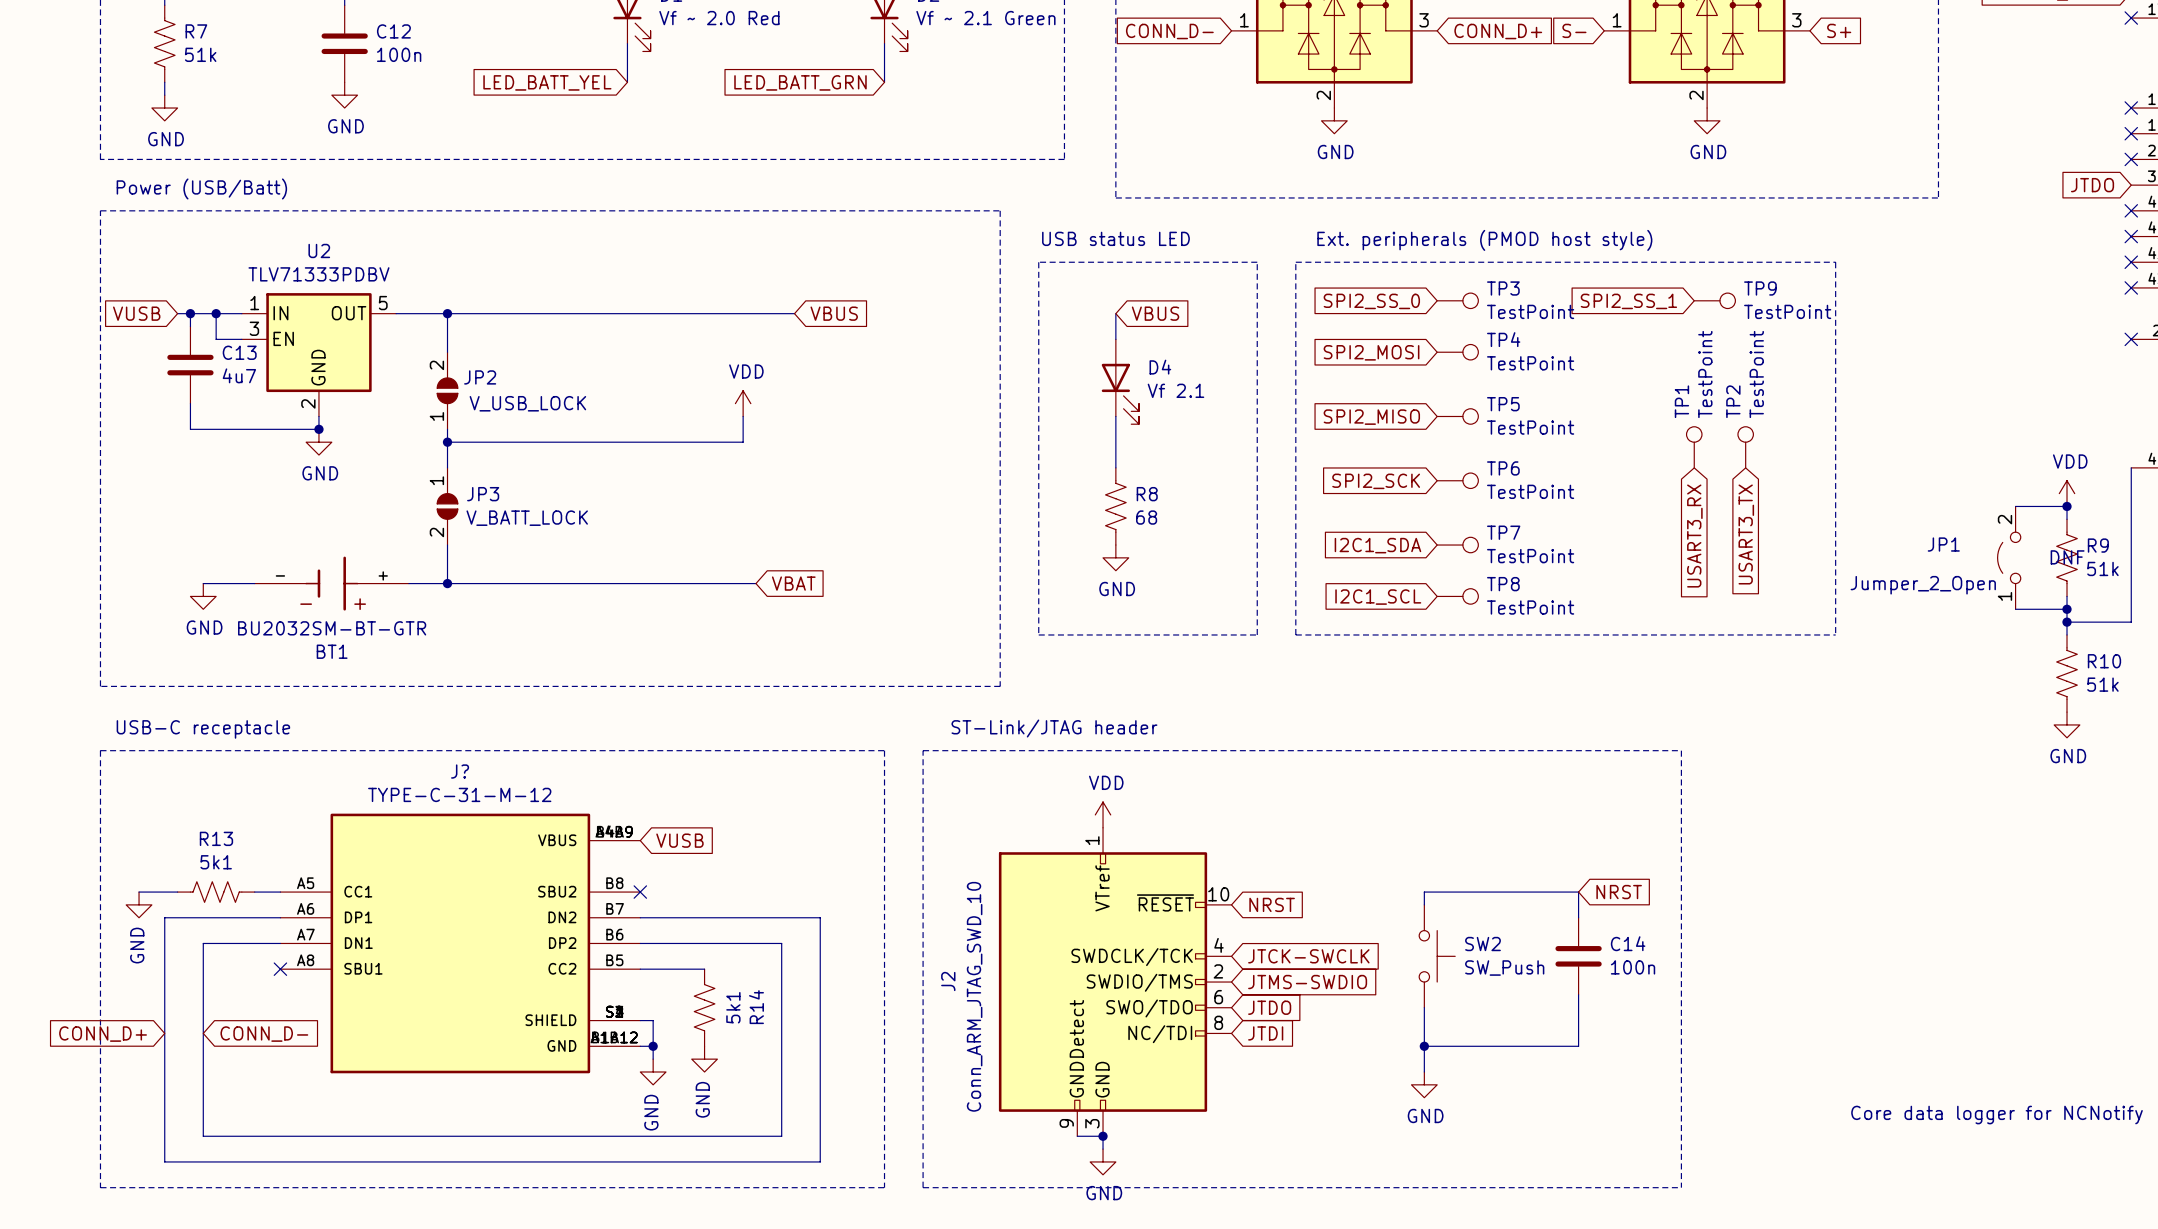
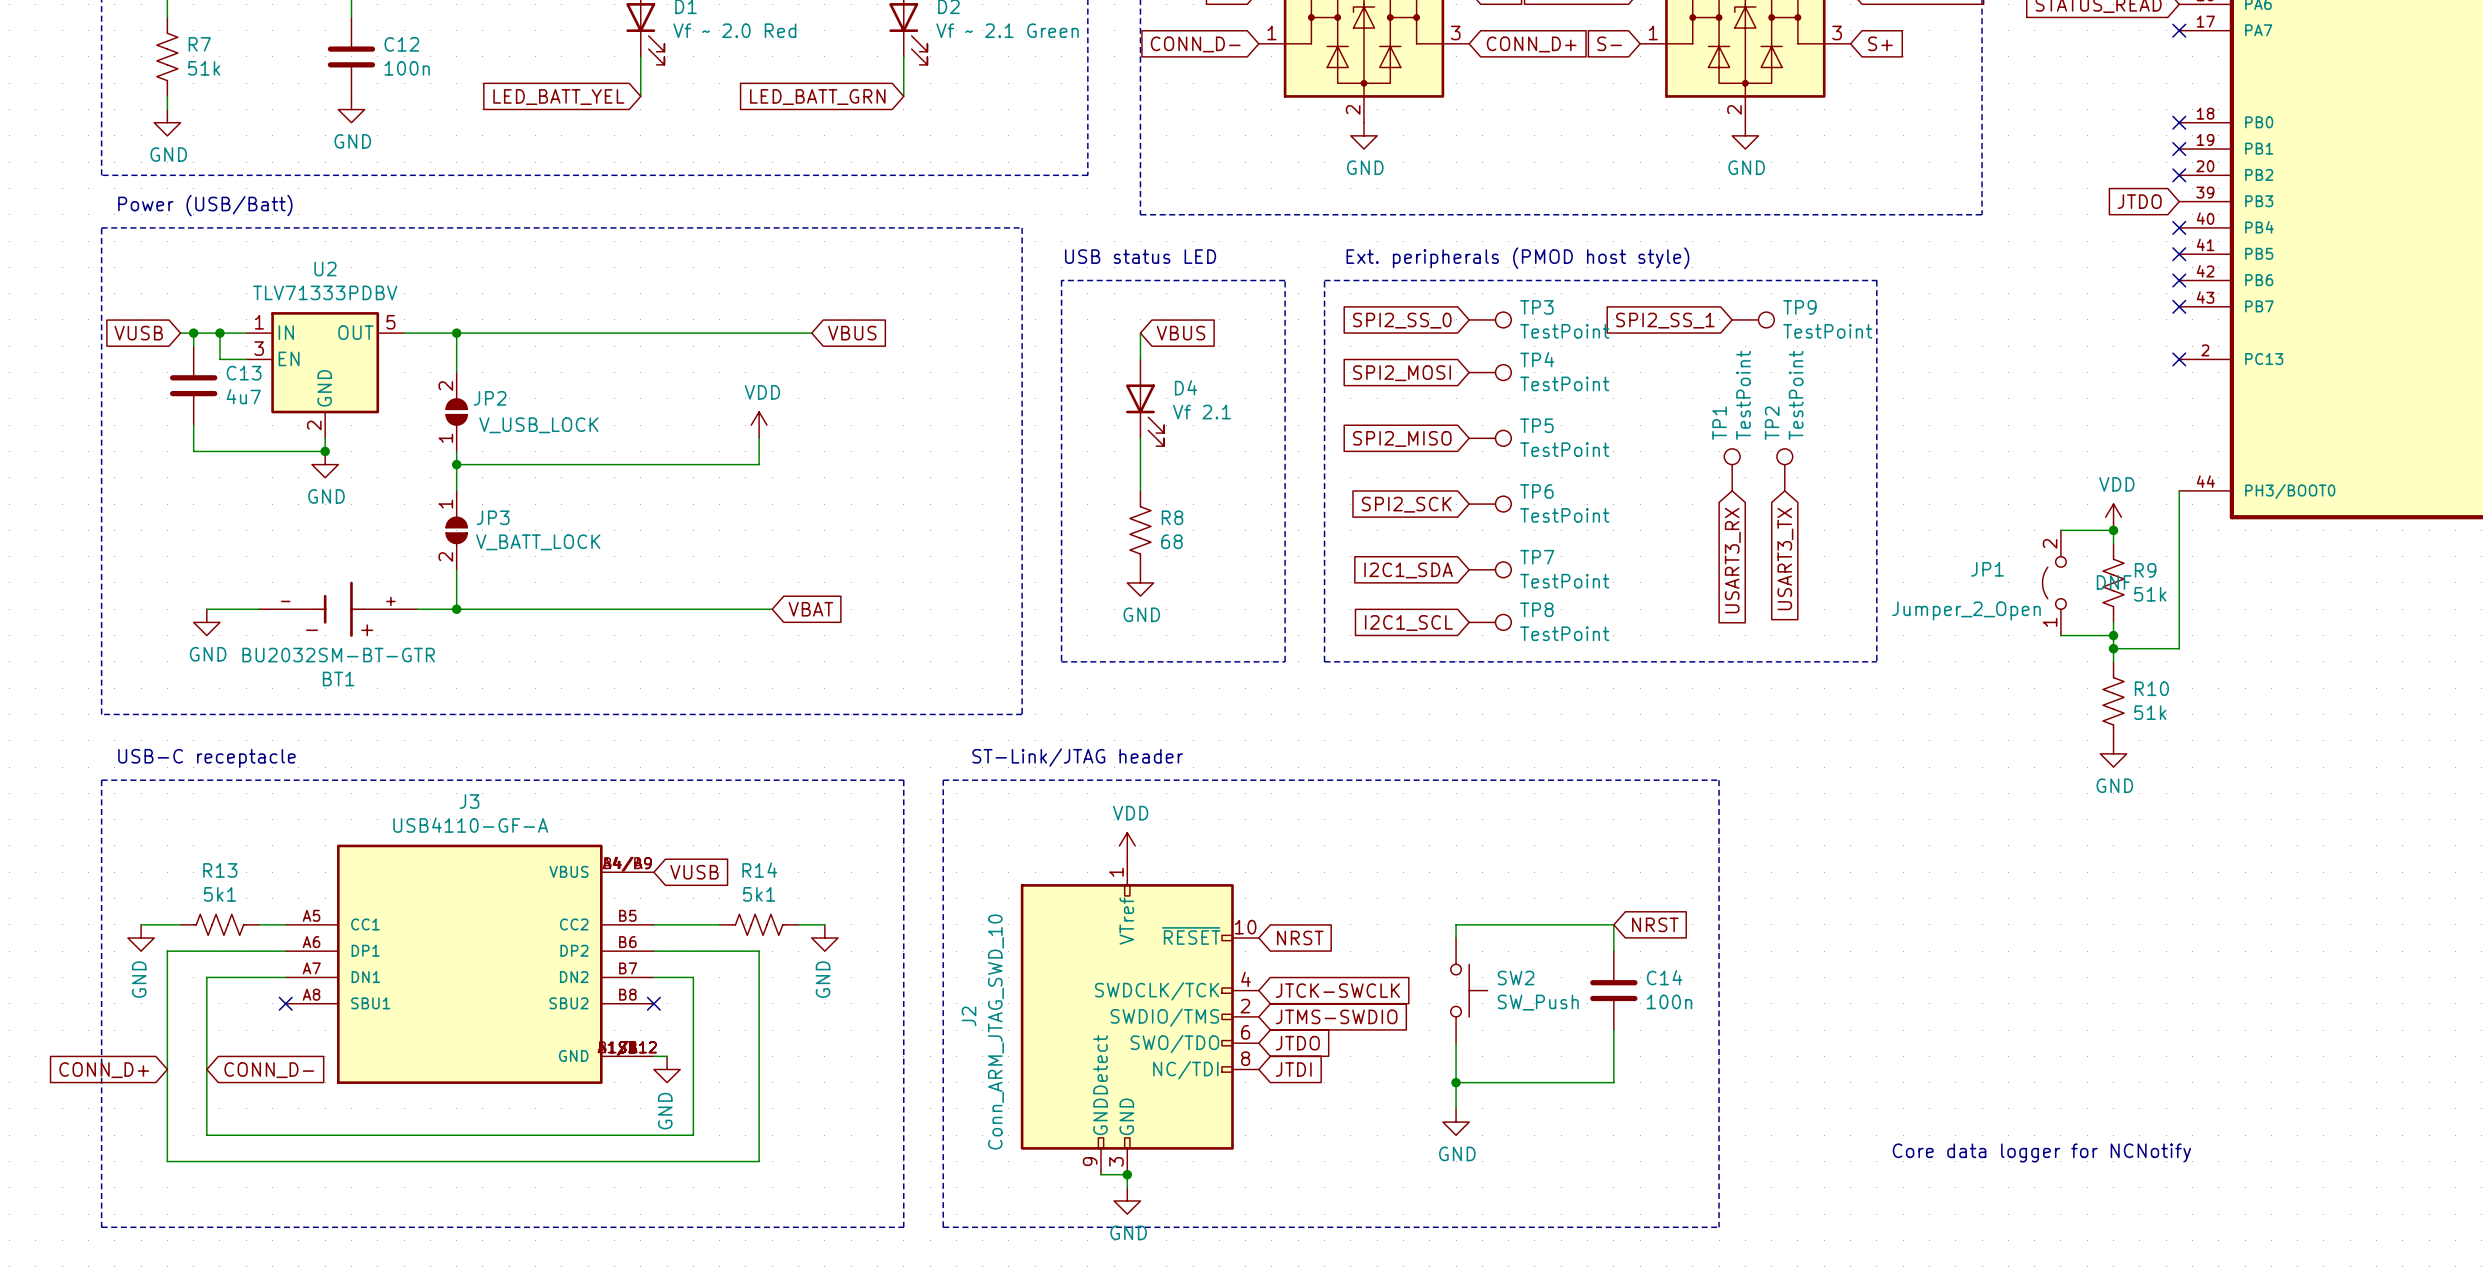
no-connect mark: (640, 892) -> none
wire: none -> (798, 924) (824, 924)
power symbol: none -> GND (824, 938)
wire: (743, 917) (820, 917) (820, 1161) (164, 1161) (164, 1123) -> (759, 951) (759, 1161) (167, 1161)
J3: none -> USB4110-GF-A (469, 964)
J?: TYPE-C-31-M-12 (460, 943) -> none
wire: (678, 943) (781, 943) (781, 1136) (203, 1136) (203, 1097) -> (693, 977) (693, 1135) (206, 1135)
wire: (640, 969) (704, 969) -> (653, 924) (719, 924)
no-connect mark: none -> (653, 1003)
R14 rotation: 0° (704, 1007) -> 90° clockwise (759, 924)
R14 position: (704, 1007) -> (759, 924)
R14 value position: 5k1 (733, 1007) -> 5k1 (759, 894)
R14 name position: R14 (756, 1007) -> R14 (759, 870)
wire: (653, 1020) (653, 1059) -> none
power symbol: none -> GND (667, 1069)
wire: (640, 1046) (653, 1046) -> none
junction: (653, 1046) -> none
power symbol: GND (704, 1059) -> none
power symbol: GND (653, 1071) -> none

